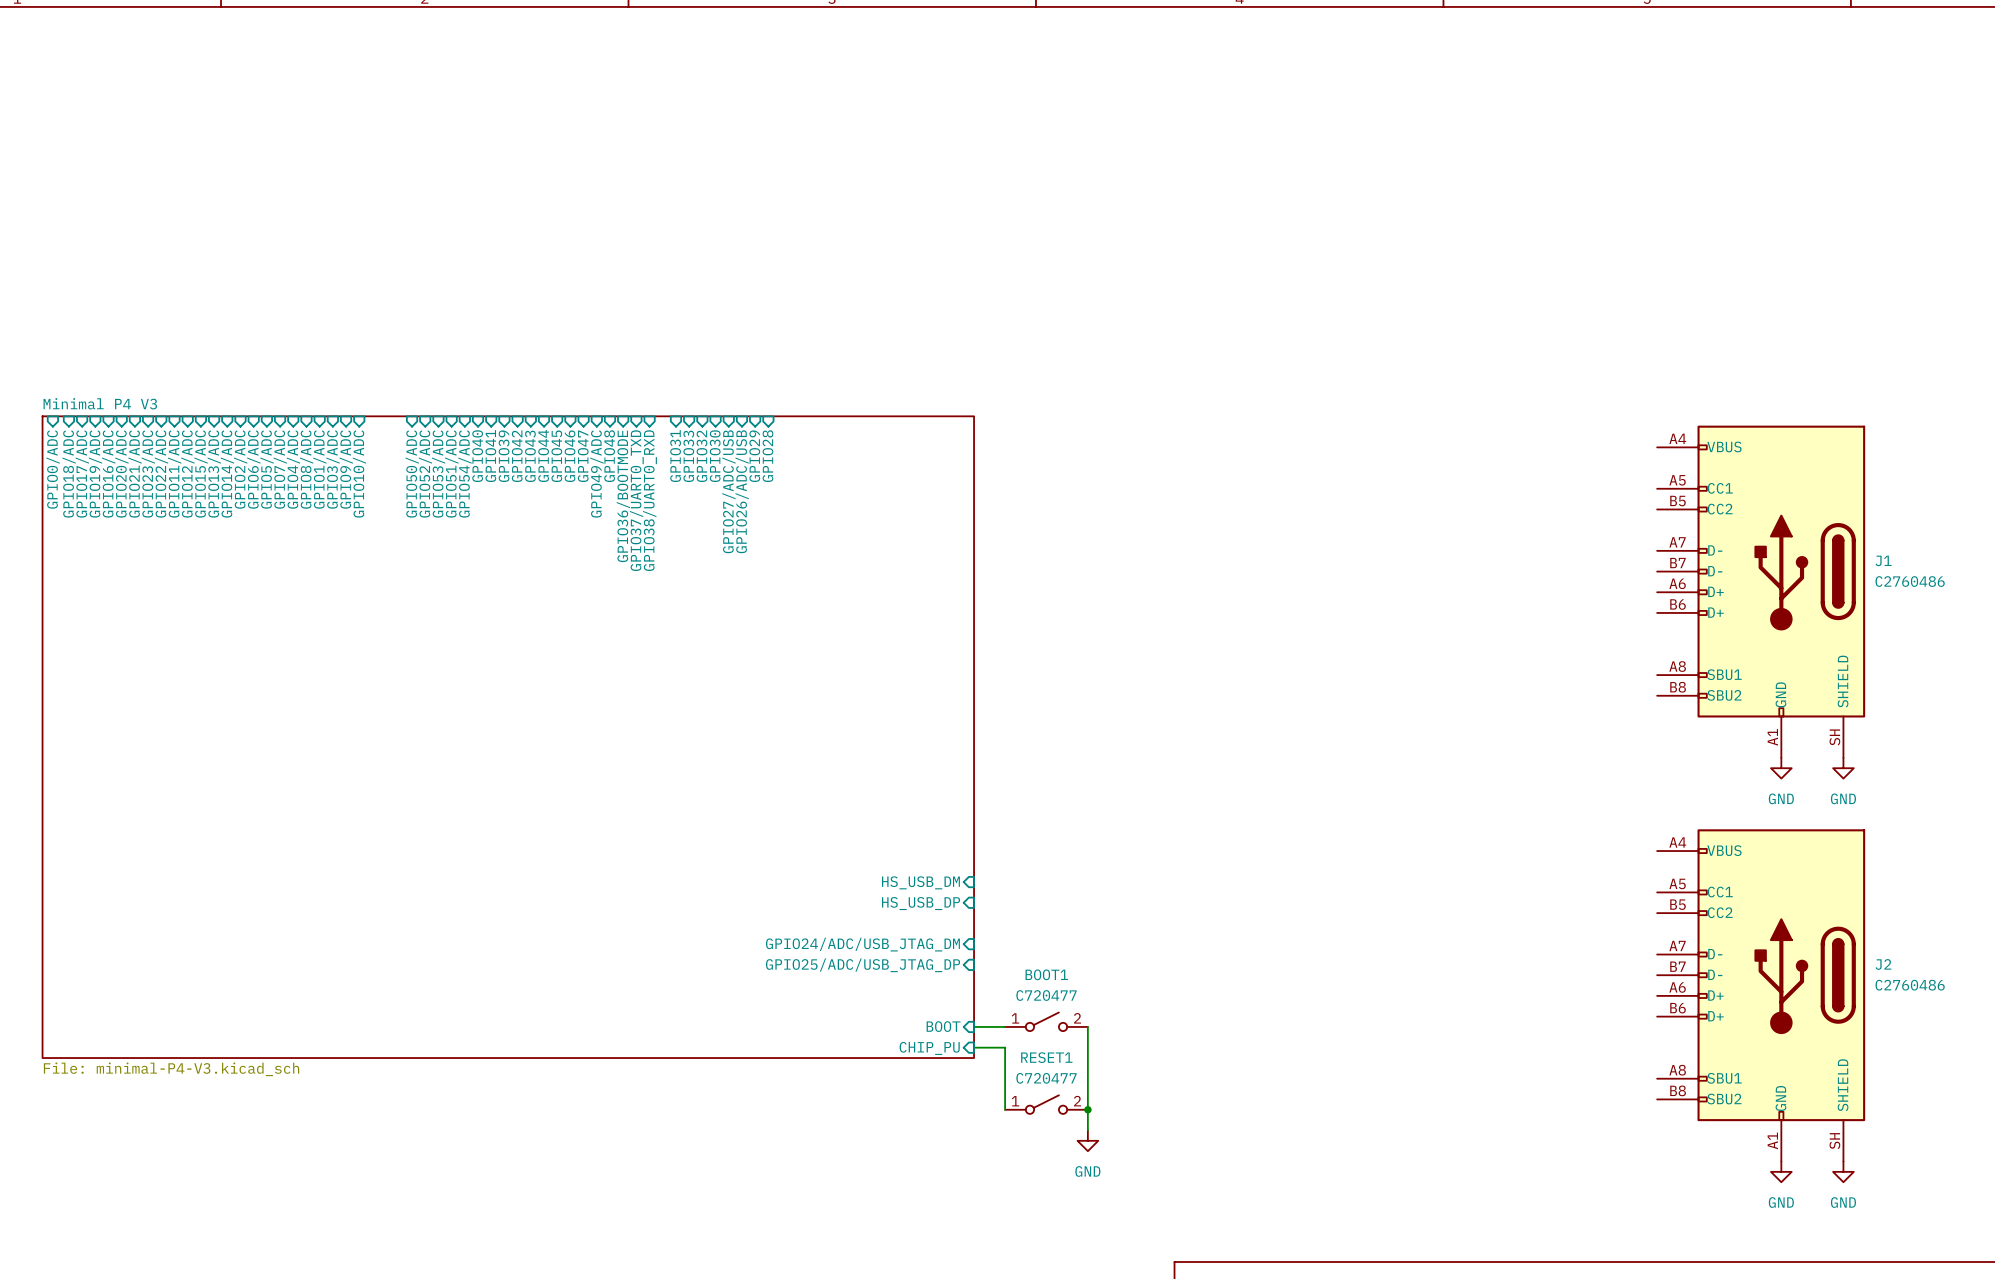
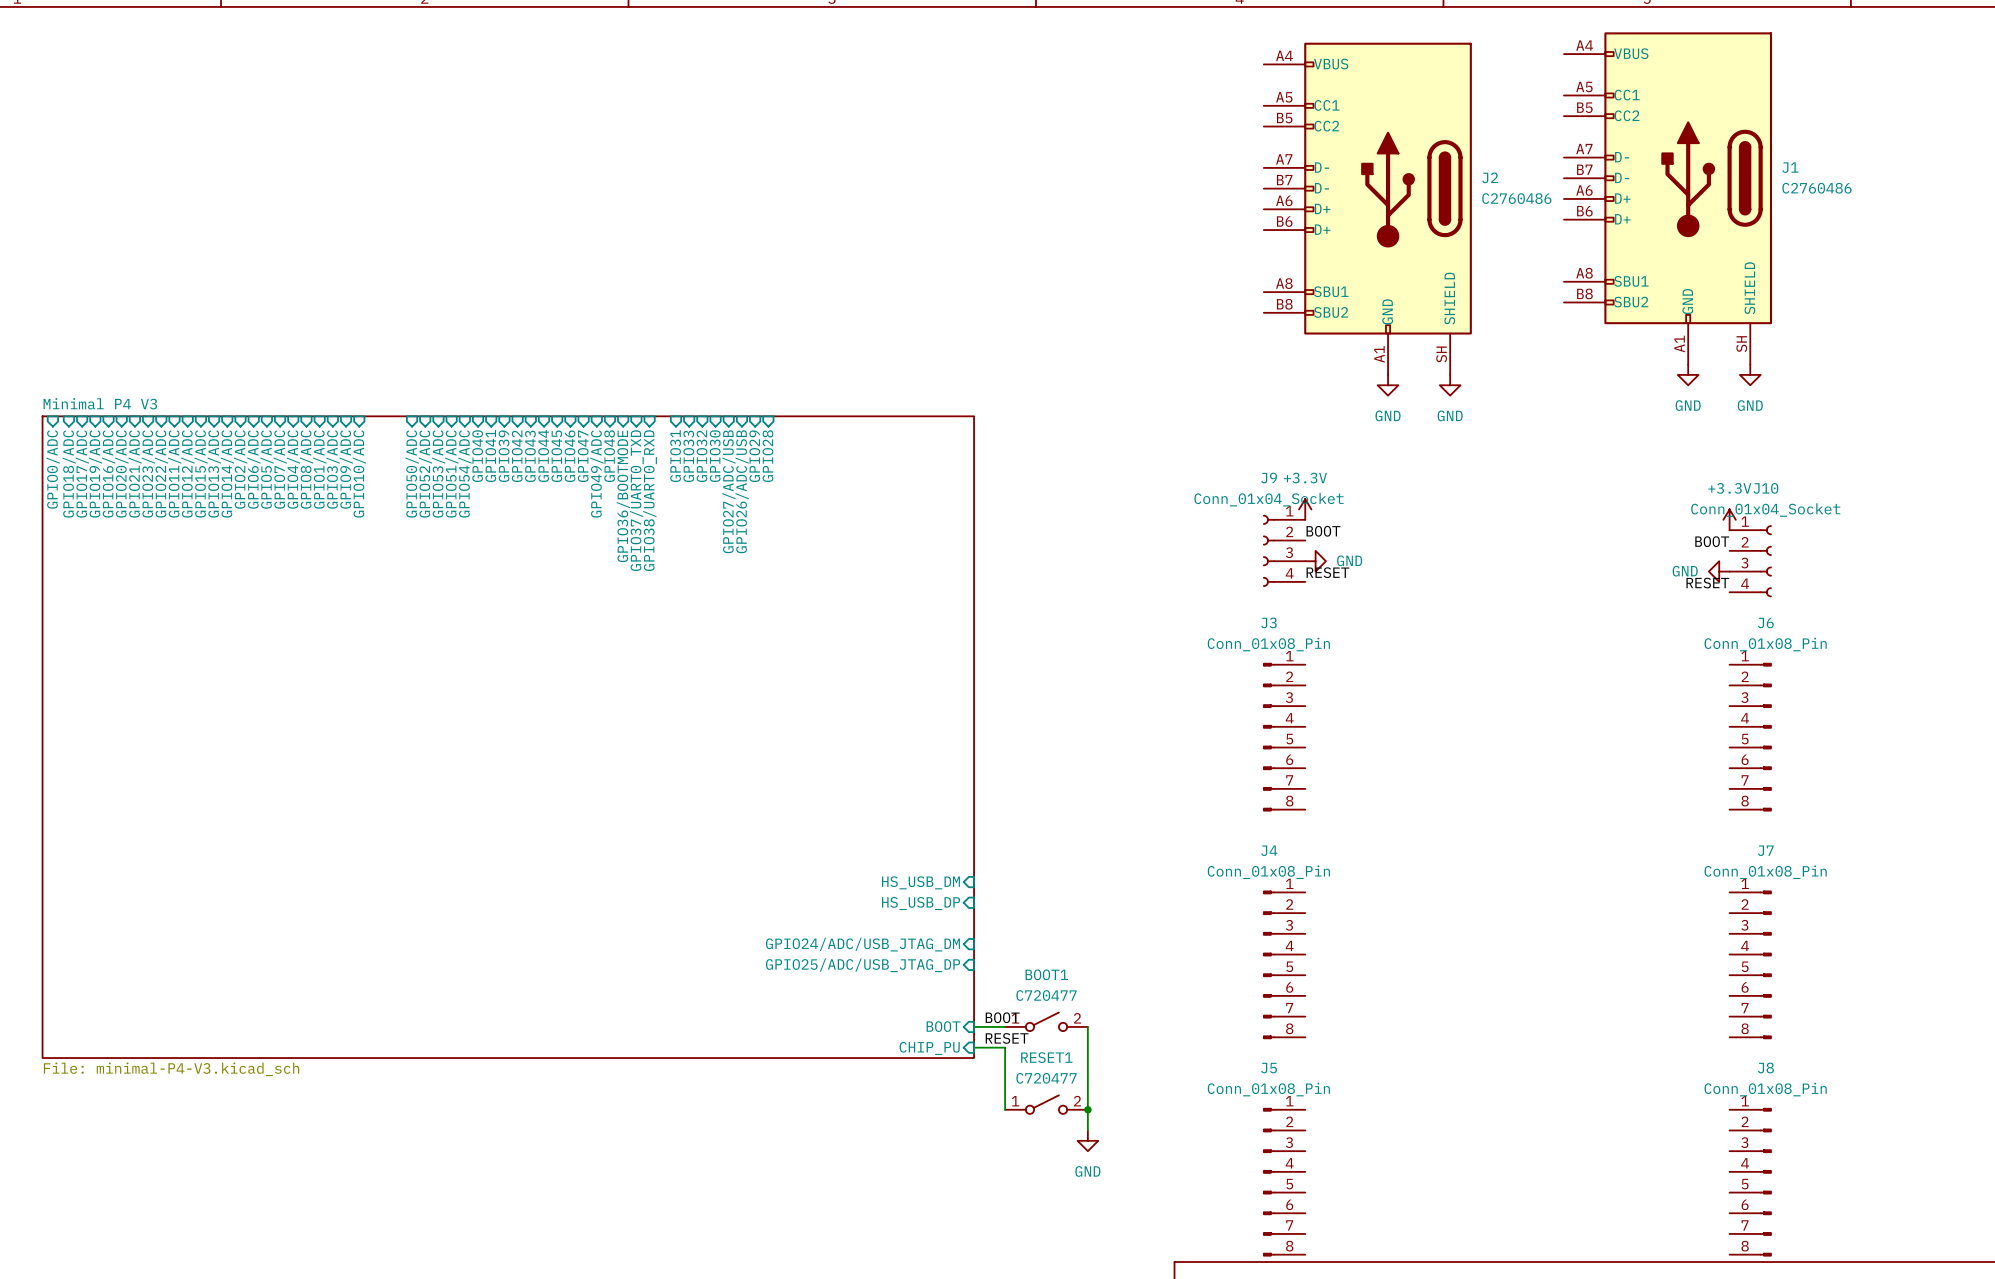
power symbol: none -> GND (1688, 374)
power symbol: none -> GND (1750, 374)
power symbol: none -> GND (1388, 385)
power symbol: none -> GND (1450, 385)
power symbol: none -> +3.3V (1305, 509)
power symbol: none -> +3.3V (1729, 519)
label: none -> BOOT (1323, 531)
label: none -> BOOT (1712, 541)
J9: none -> Conn_01x04_Socket (1284, 550)
power symbol: none -> GND (1315, 561)
J10: none -> Conn_01x04_Socket (1750, 561)
power symbol: none -> GND (1719, 571)
label: none -> RESET (1327, 572)
label: none -> RESET (1707, 583)
J1 position: (1761, 591) -> (1668, 198)
J3: none -> Conn_01x08_Pin (1284, 737)
J6: none -> Conn_01x08_Pin (1750, 737)
power symbol: GND (1781, 768) -> none
power symbol: GND (1843, 768) -> none
J4: none -> Conn_01x08_Pin (1284, 964)
J7: none -> Conn_01x08_Pin (1750, 964)
J2 position: (1761, 995) -> (1367, 208)
label: none -> BOOT (1002, 1017)
label: none -> RESET (1007, 1038)
power symbol: GND (1781, 1171) -> none
power symbol: GND (1843, 1171) -> none
J5: none -> Conn_01x08_Pin (1284, 1182)
J8: none -> Conn_01x08_Pin (1750, 1182)

